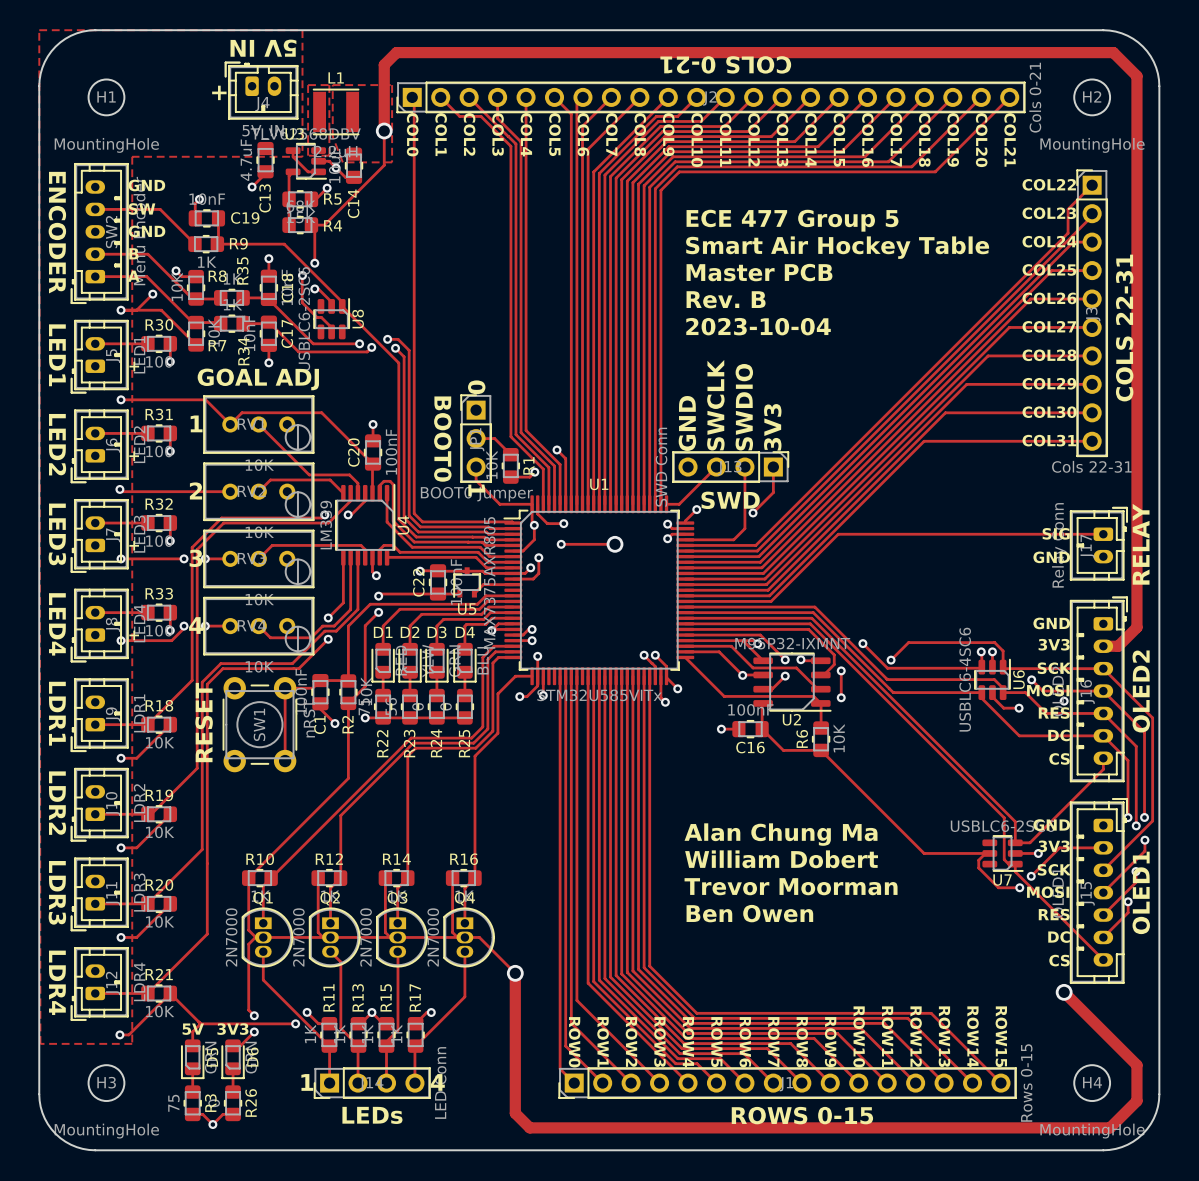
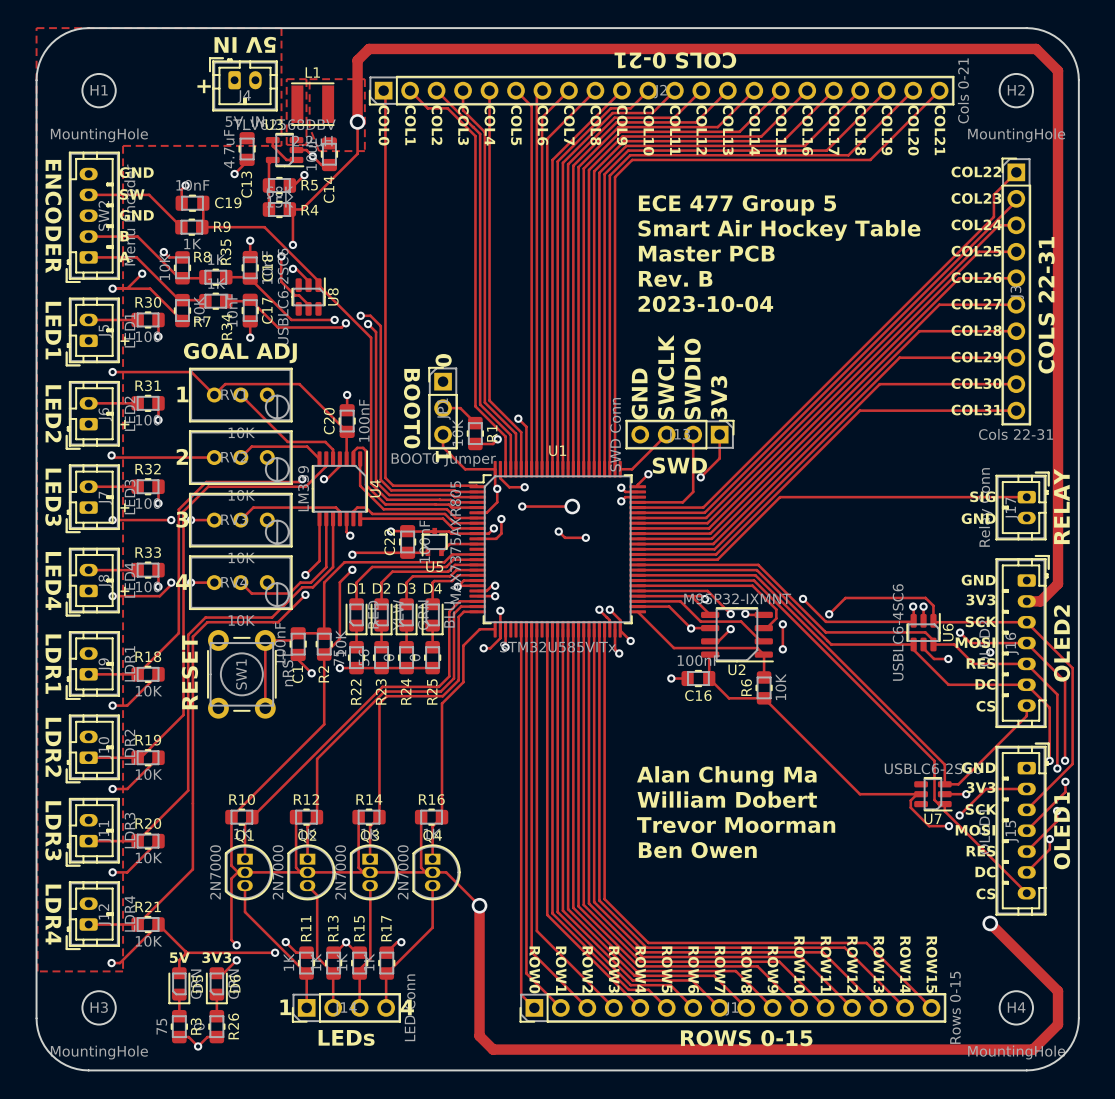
track: none -> (558, 531) (565, 537) (585, 537)
via: none -> (558, 531)
via: none -> (585, 537)

